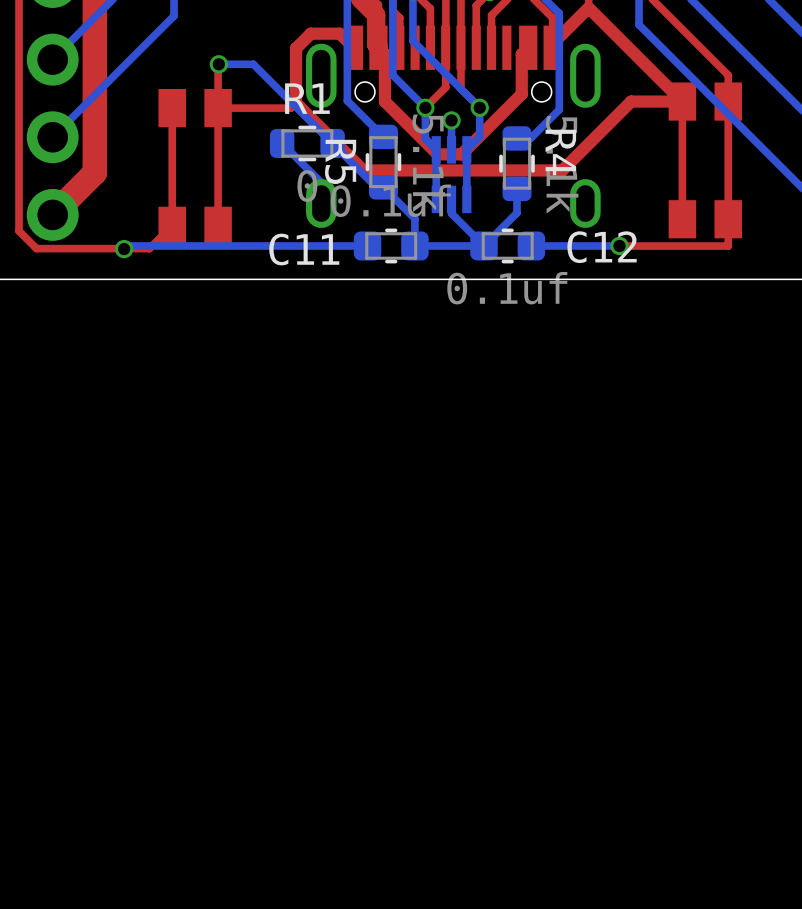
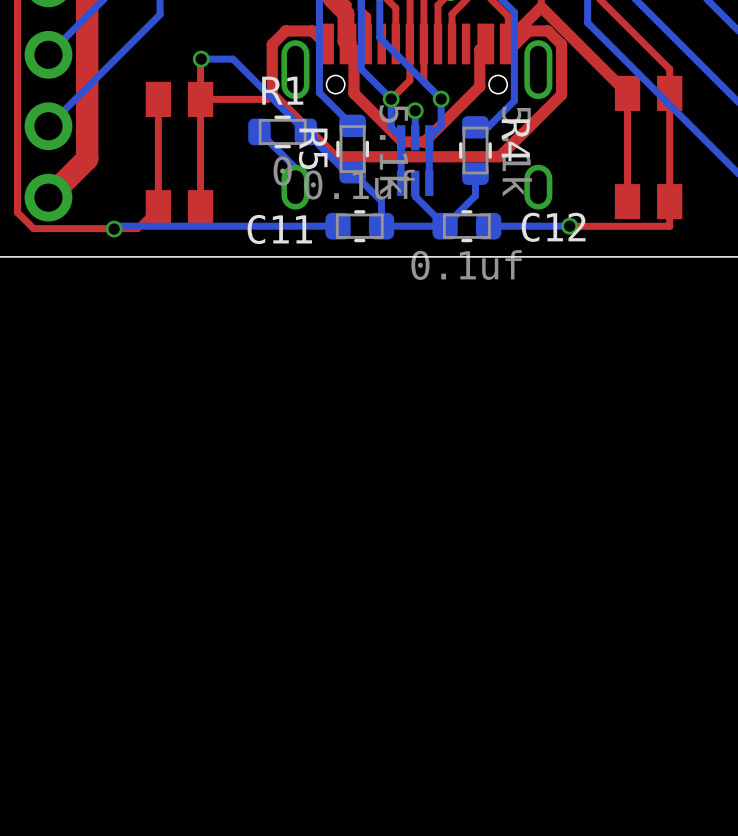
top track: (682, 101) (631, 101) (562, 170) (543, 170) -> (508, 51) (528, 30) (547, 30) (561, 44) (561, 94) (499, 156)

